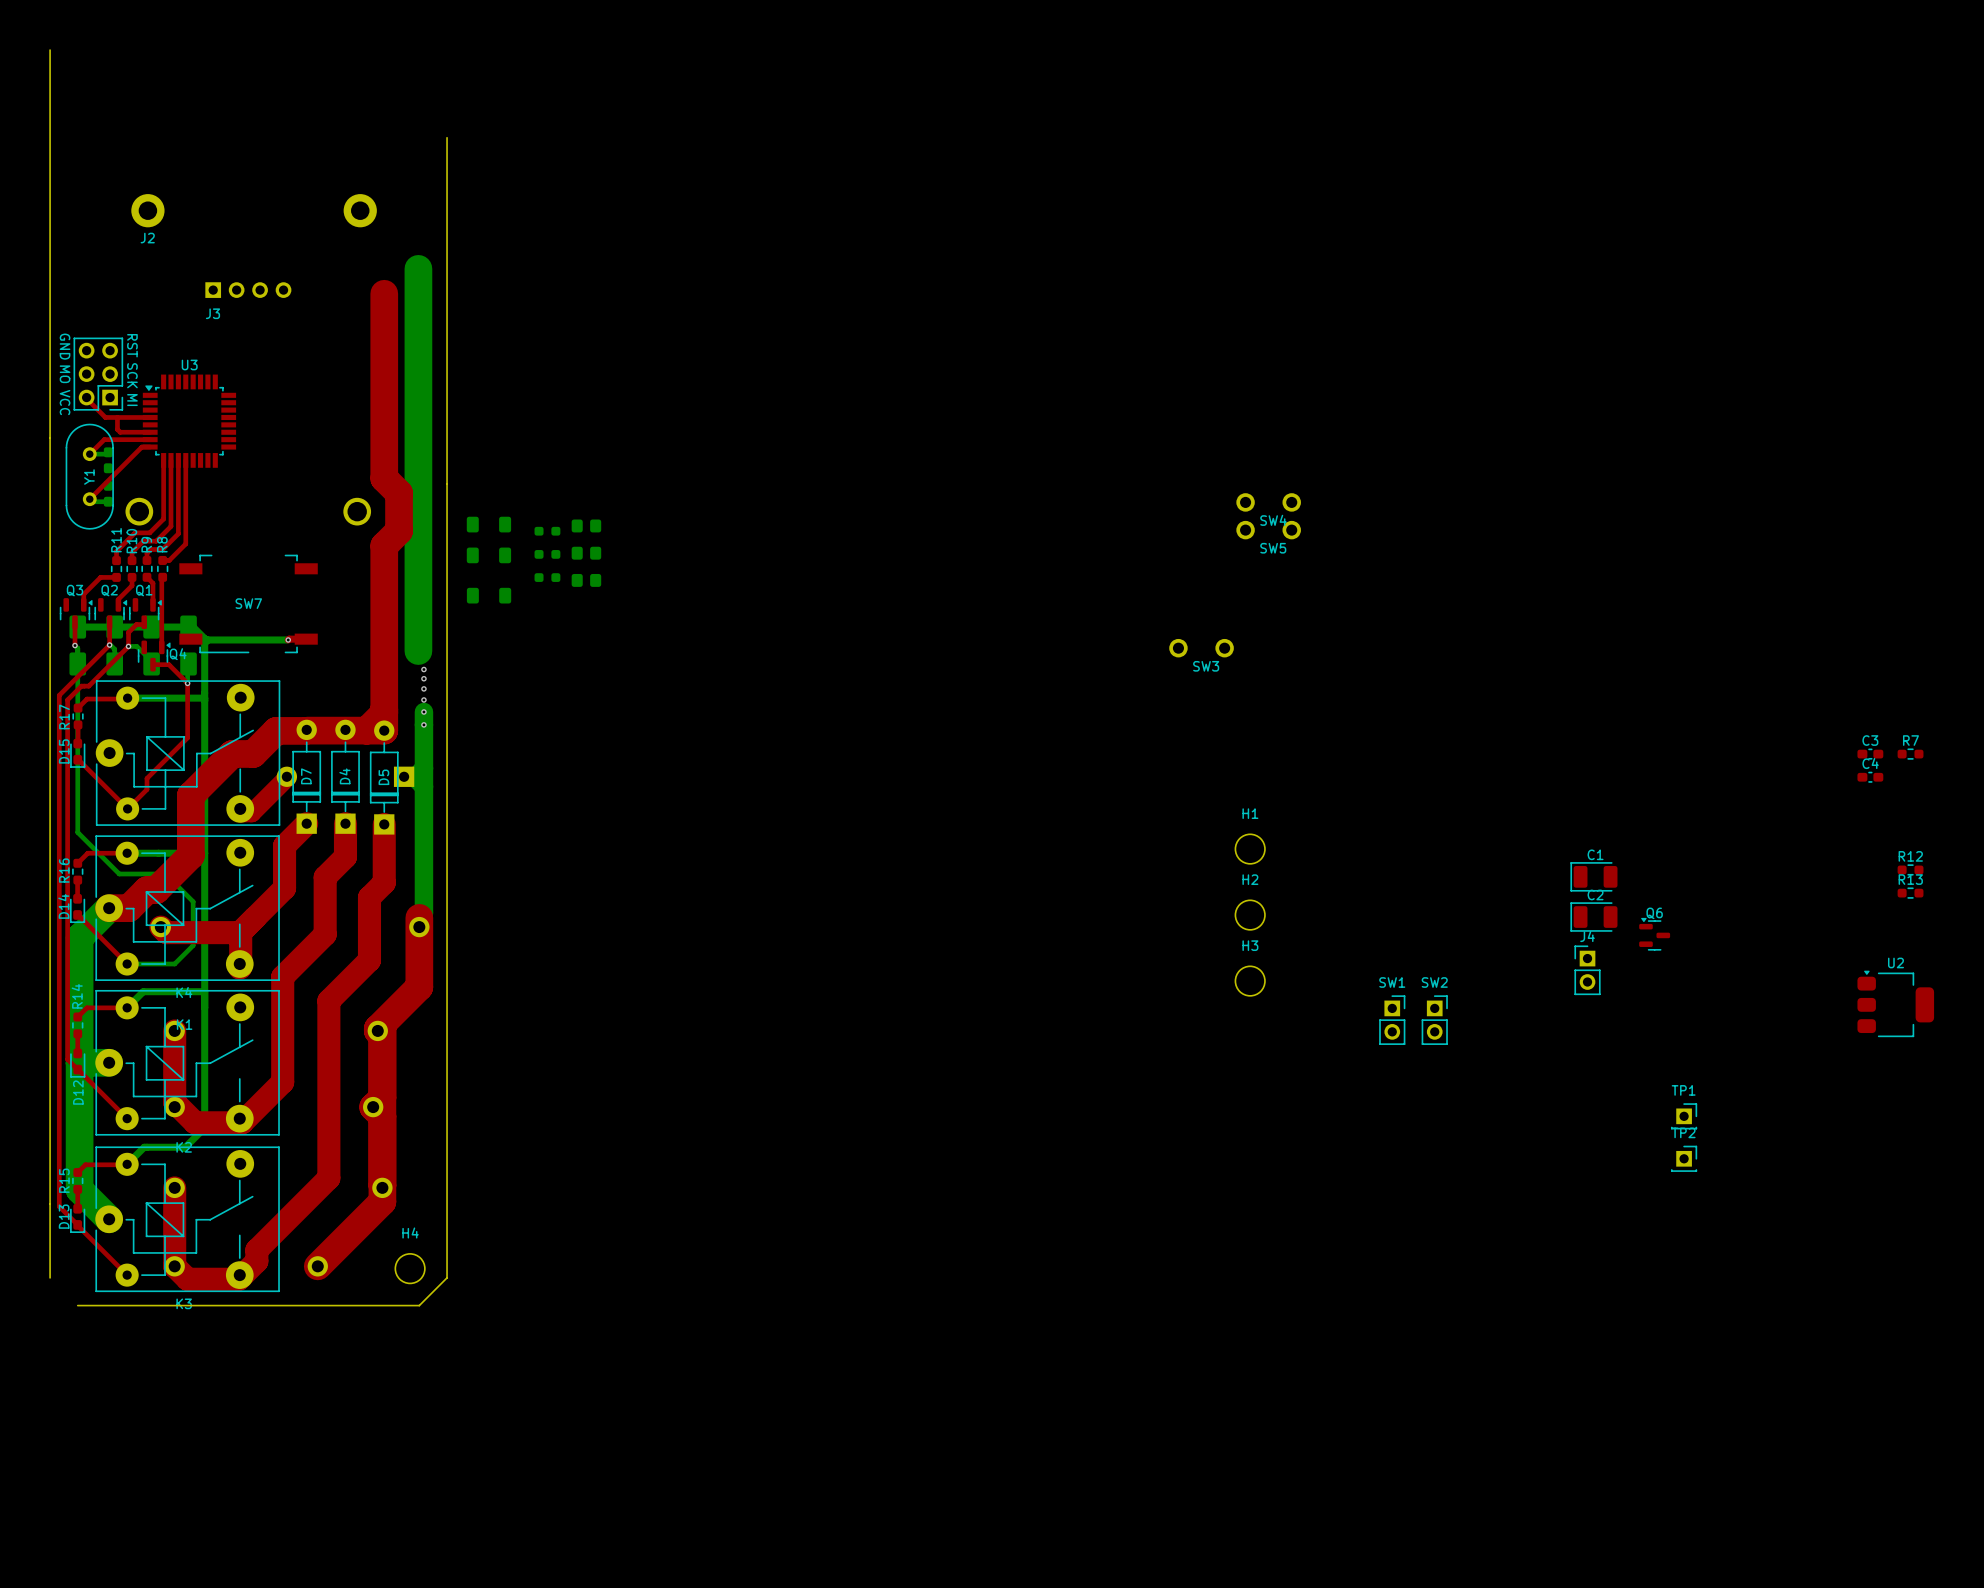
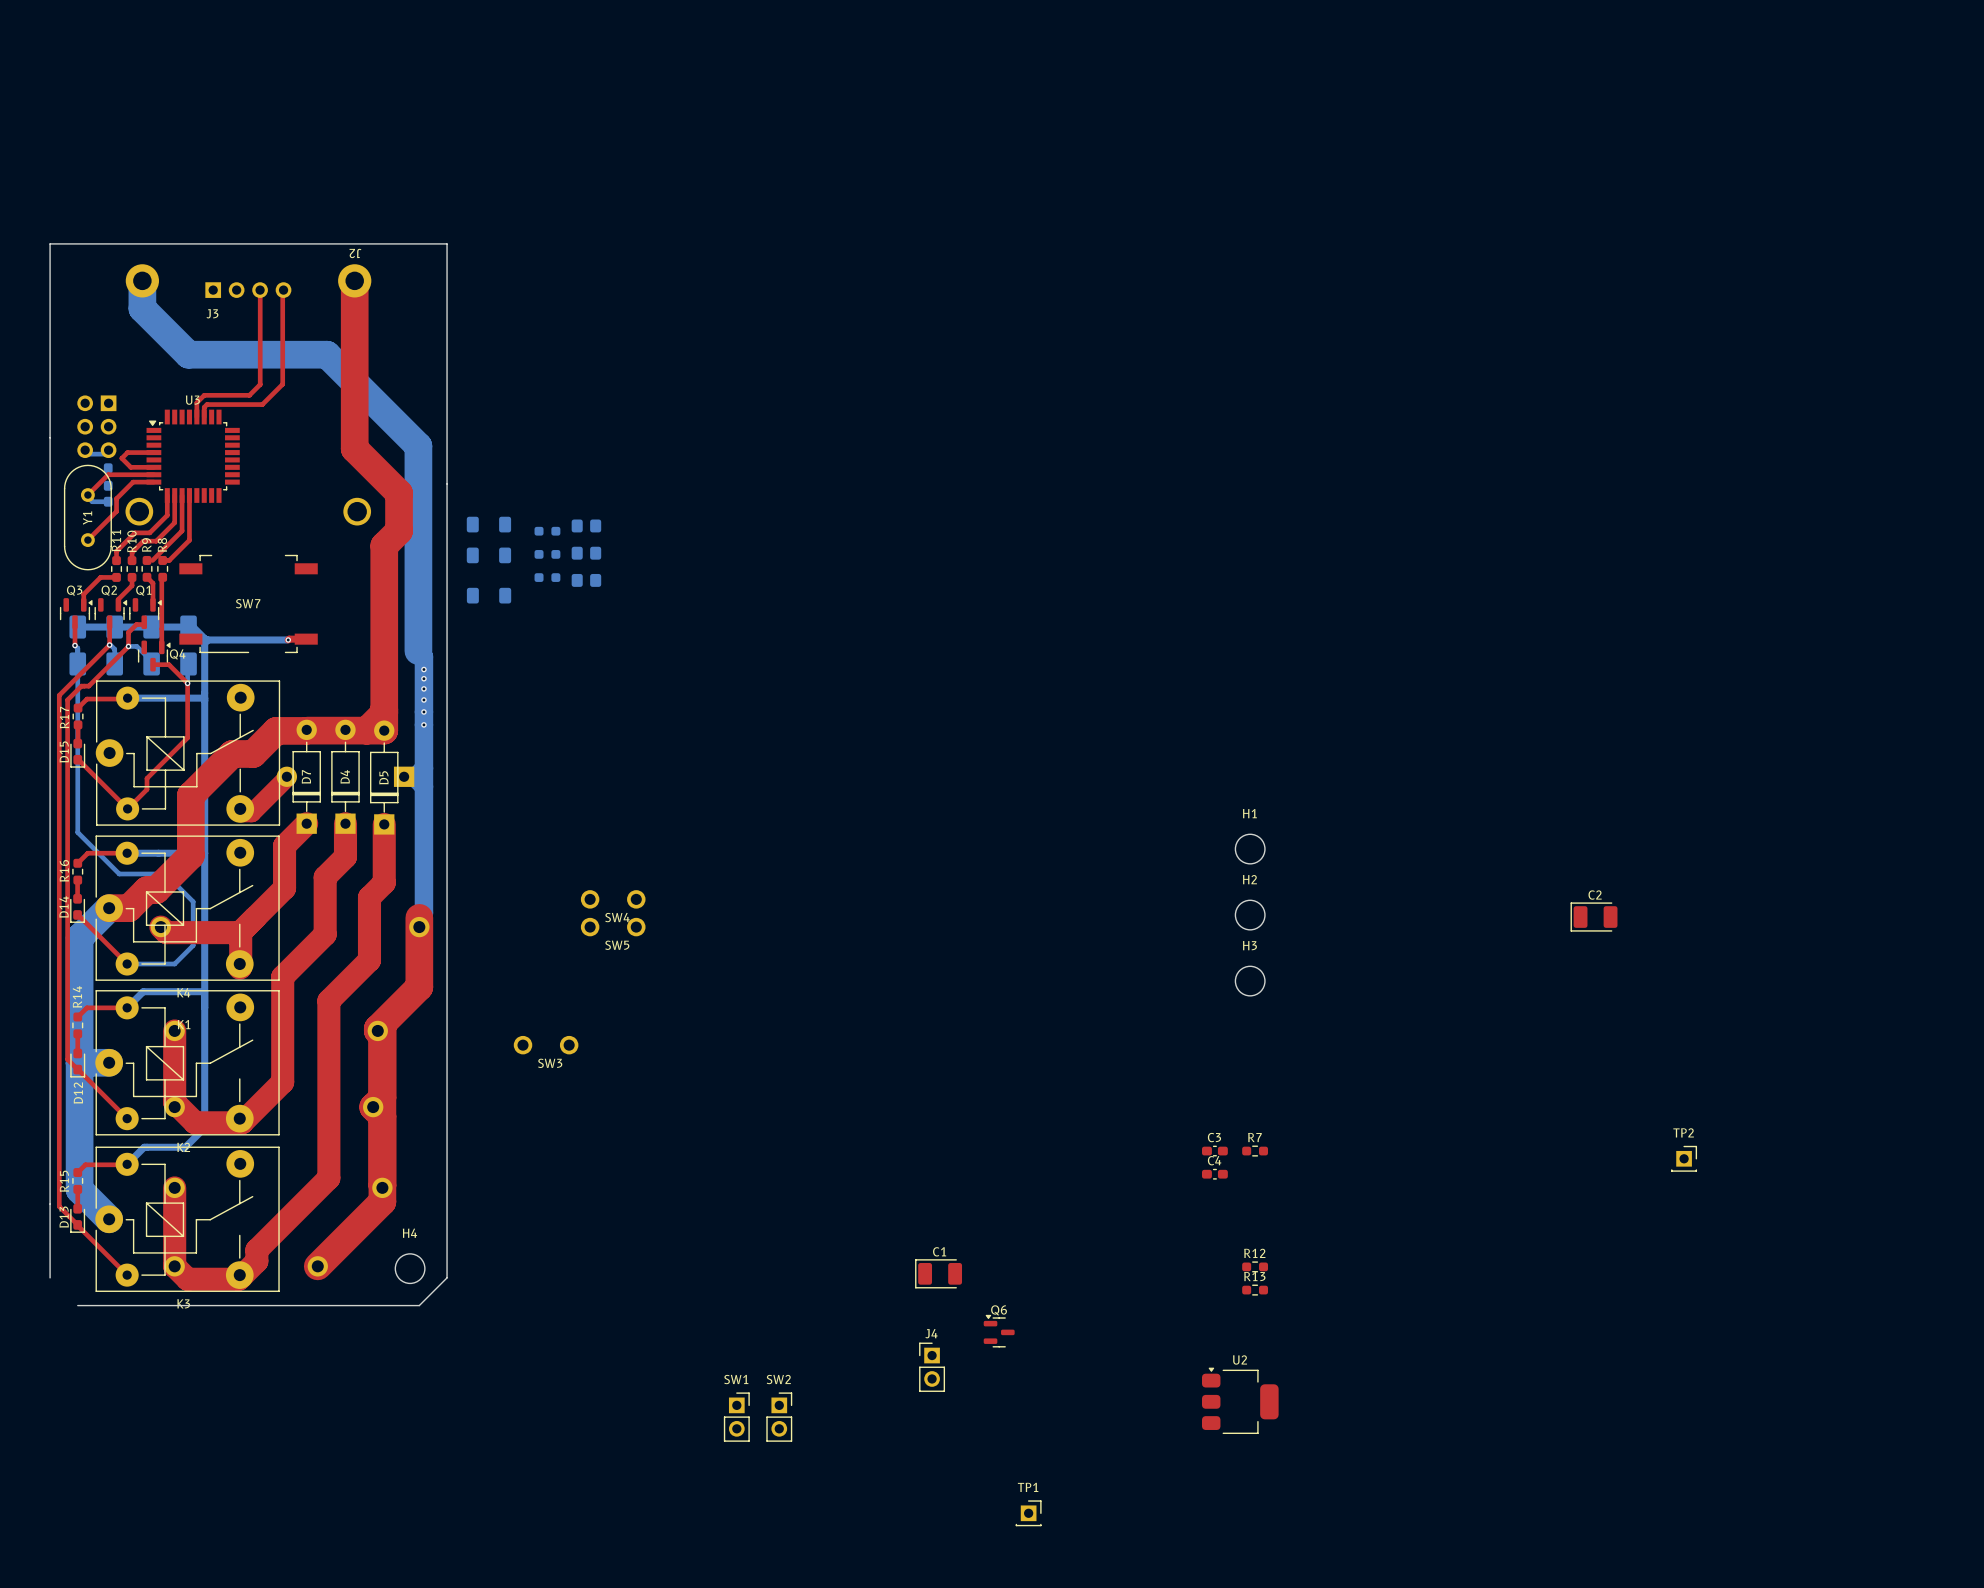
board edge: (50, 50) (50, 243) -> none
board edge: (447, 137) (447, 243) -> (50, 243) (447, 243)
J2 position: (254, 210) -> (248, 280)
J2 name rotation: 0° (147, 238) -> 180° (355, 253)
J2 name position: J2 (147, 238) -> J2 (355, 253)
bottom track: (418, 268) (418, 446) -> (142, 280) (142, 308) (188, 354) (327, 354) (418, 446)
top track: none -> (260, 290) (260, 384) (249, 395) (204, 395) (196, 402) (196, 417)
top track: none -> (283, 290) (282, 384) (262, 404) (207, 404) (204, 407) (204, 417)
top track: (384, 293) (384, 478) -> (354, 280) (354, 448) (384, 478)
text: RST (132, 345) -> none
text: GND (65, 346) -> none
text: MO (65, 374) -> none
part side: top (98, 374) -> bottom (96, 426)
text: SCK (132, 375) -> none
top track: (86, 397) (105, 417) (150, 417) -> none
text: MI (132, 400) -> none
text: VCC (65, 402) -> none
top track: (117, 417) (117, 429) (120, 432) (150, 432) -> none
U3 position: (189, 421) -> (193, 456)
top track: (150, 439) (104, 439) (89, 454) -> none
top track: (150, 447) (141, 447) (89, 499) -> none
top track: none -> (153, 452) (127, 452) (121, 458) (130, 467) (153, 467)
top track: (163, 460) (163, 519) -> (167, 495) (167, 515) (163, 519)
top track: (171, 460) (171, 526) -> (174, 495) (174, 522) (171, 526)
top track: (178, 460) (178, 533) (162, 549) (150, 549) (147, 553) (147, 560) -> none
top track: (185, 460) (185, 543) -> (189, 495) (189, 540) (185, 543)
top track: none -> (153, 474) (108, 474) (87, 495)
Y1 position: (89, 476) -> (87, 517)
top track: none -> (153, 482) (133, 482) (116, 498) (116, 511) (87, 540)
top track: none -> (182, 495) (182, 530) (152, 560)
SW4 position: (1268, 502) -> (613, 899)
SW5 position: (1268, 530) -> (613, 927)
SW3 position: (1201, 648) -> (546, 1045)
bottom track: none -> (418, 651) (423, 656) (423, 711)
C3 position: (1870, 754) -> (1214, 1151)
R7 position: (1910, 754) -> (1255, 1151)
C4 position: (1870, 777) -> (1214, 1174)
R12 position: (1910, 869) -> (1255, 1266)
C1 position: (1594, 876) -> (938, 1273)
R13 position: (1910, 893) -> (1255, 1290)
Q6 position: (1654, 934) -> (999, 1331)
J4 position: (1587, 970) -> (932, 1367)
U2 position: (1895, 1003) -> (1240, 1400)
SW1 position: (1392, 1020) -> (736, 1417)
SW2 position: (1434, 1020) -> (779, 1417)
TP1 position: (1684, 1116) -> (1028, 1513)

